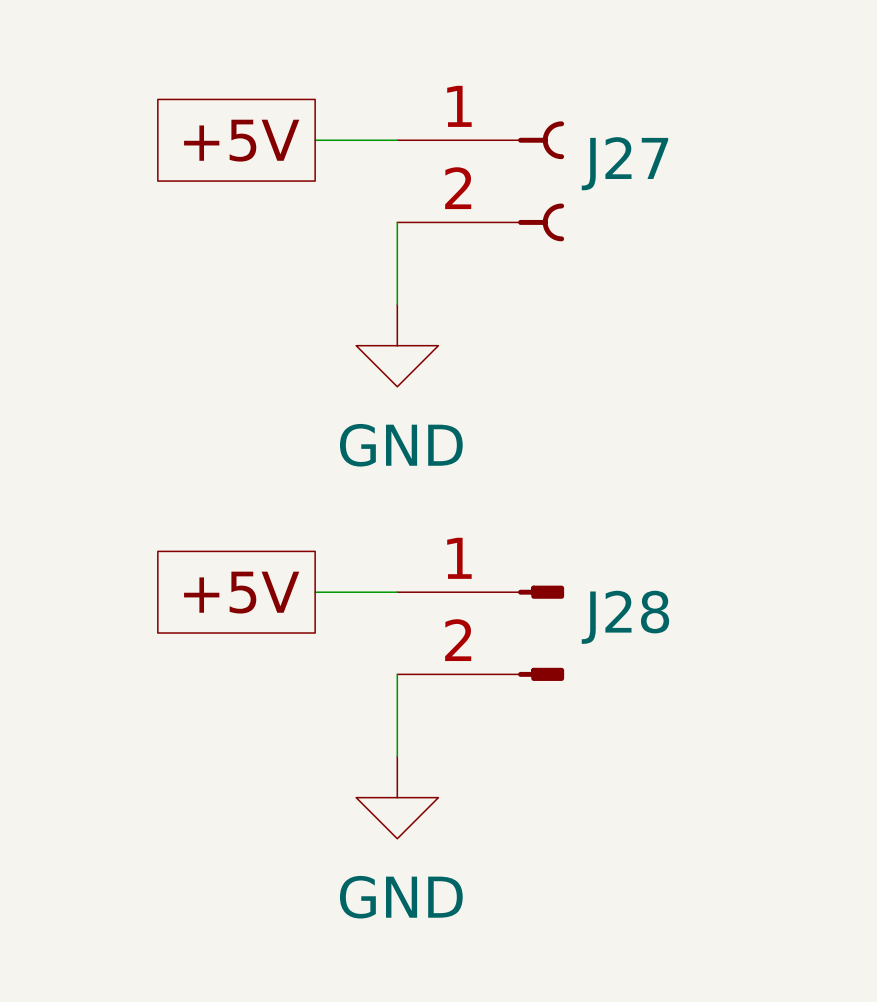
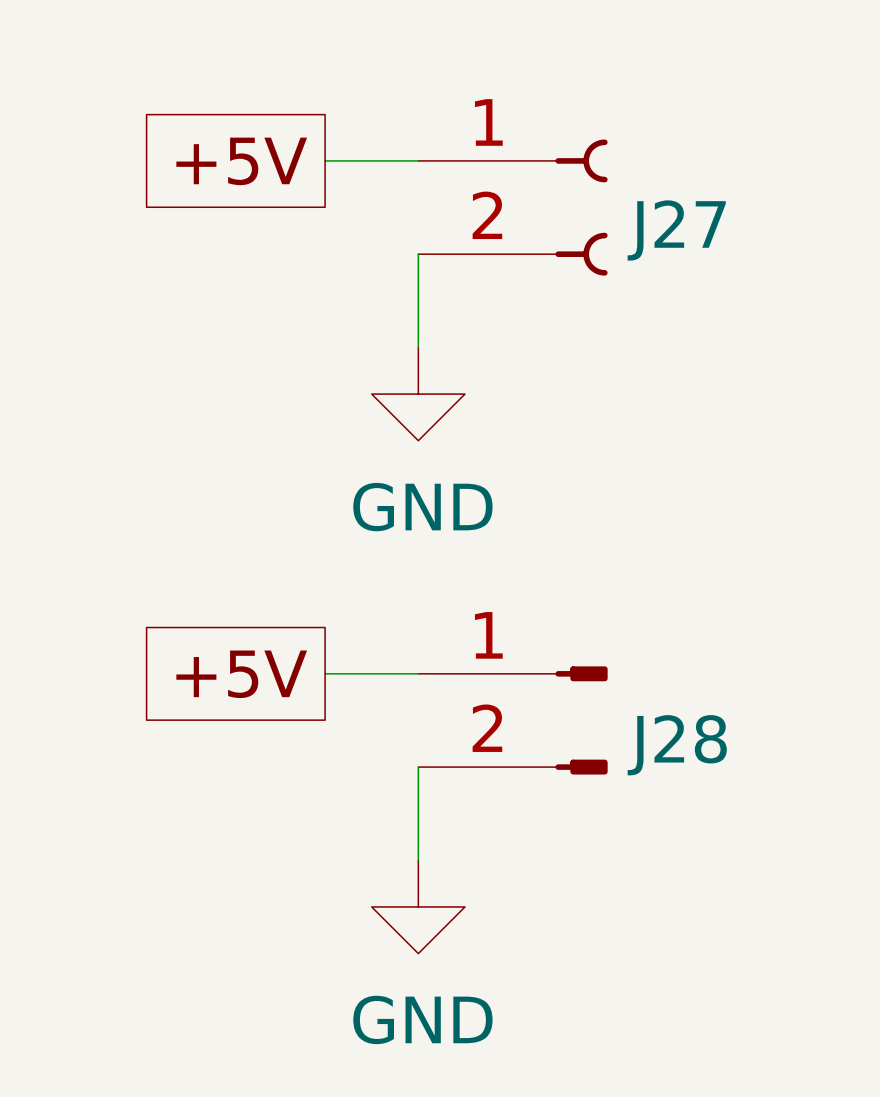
J27 name position: J27 (624, 163) -> J27 (676, 230)
J28 name position: J28 (625, 617) -> J28 (677, 745)

